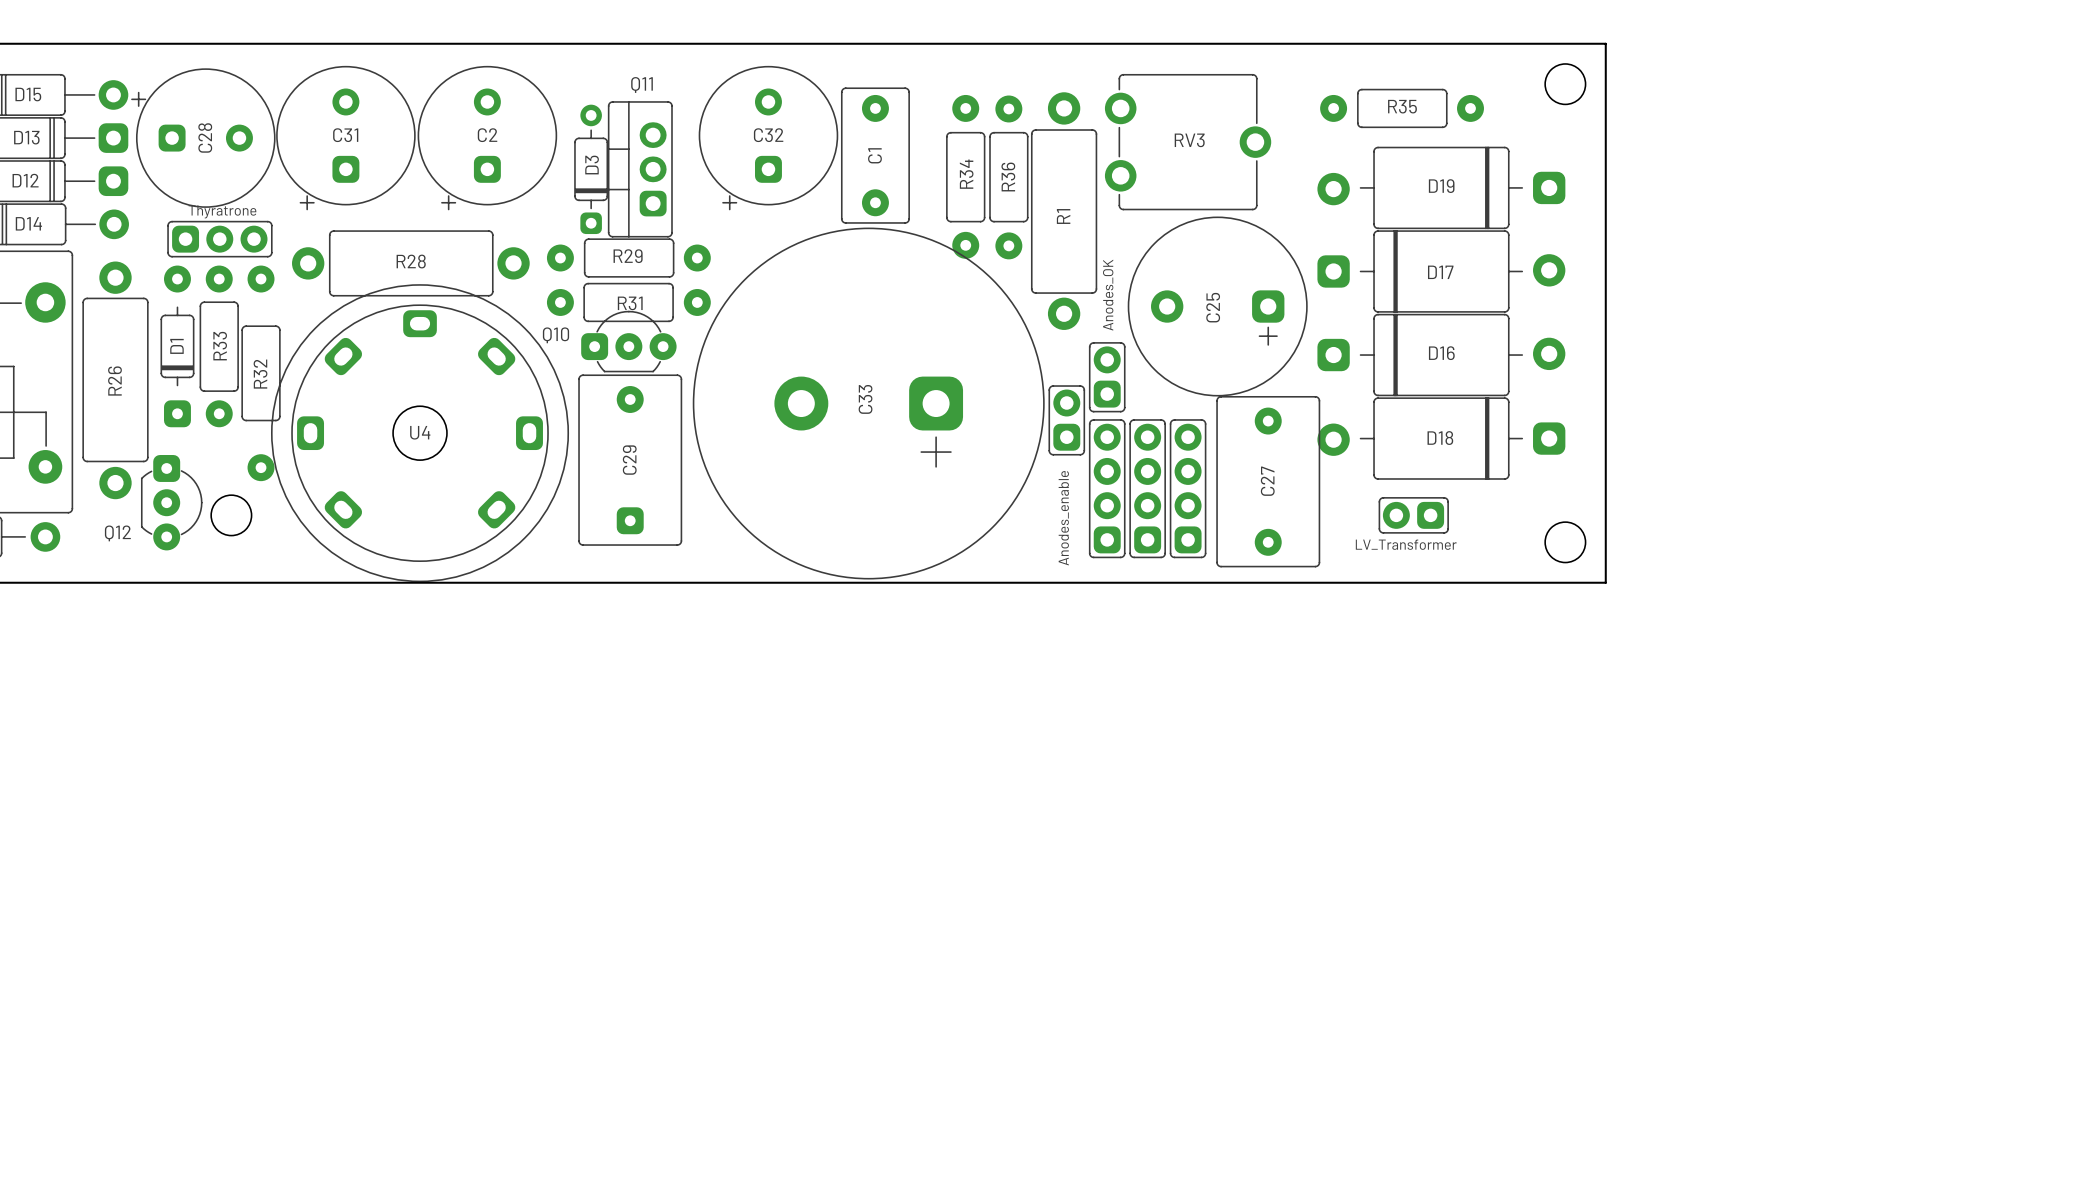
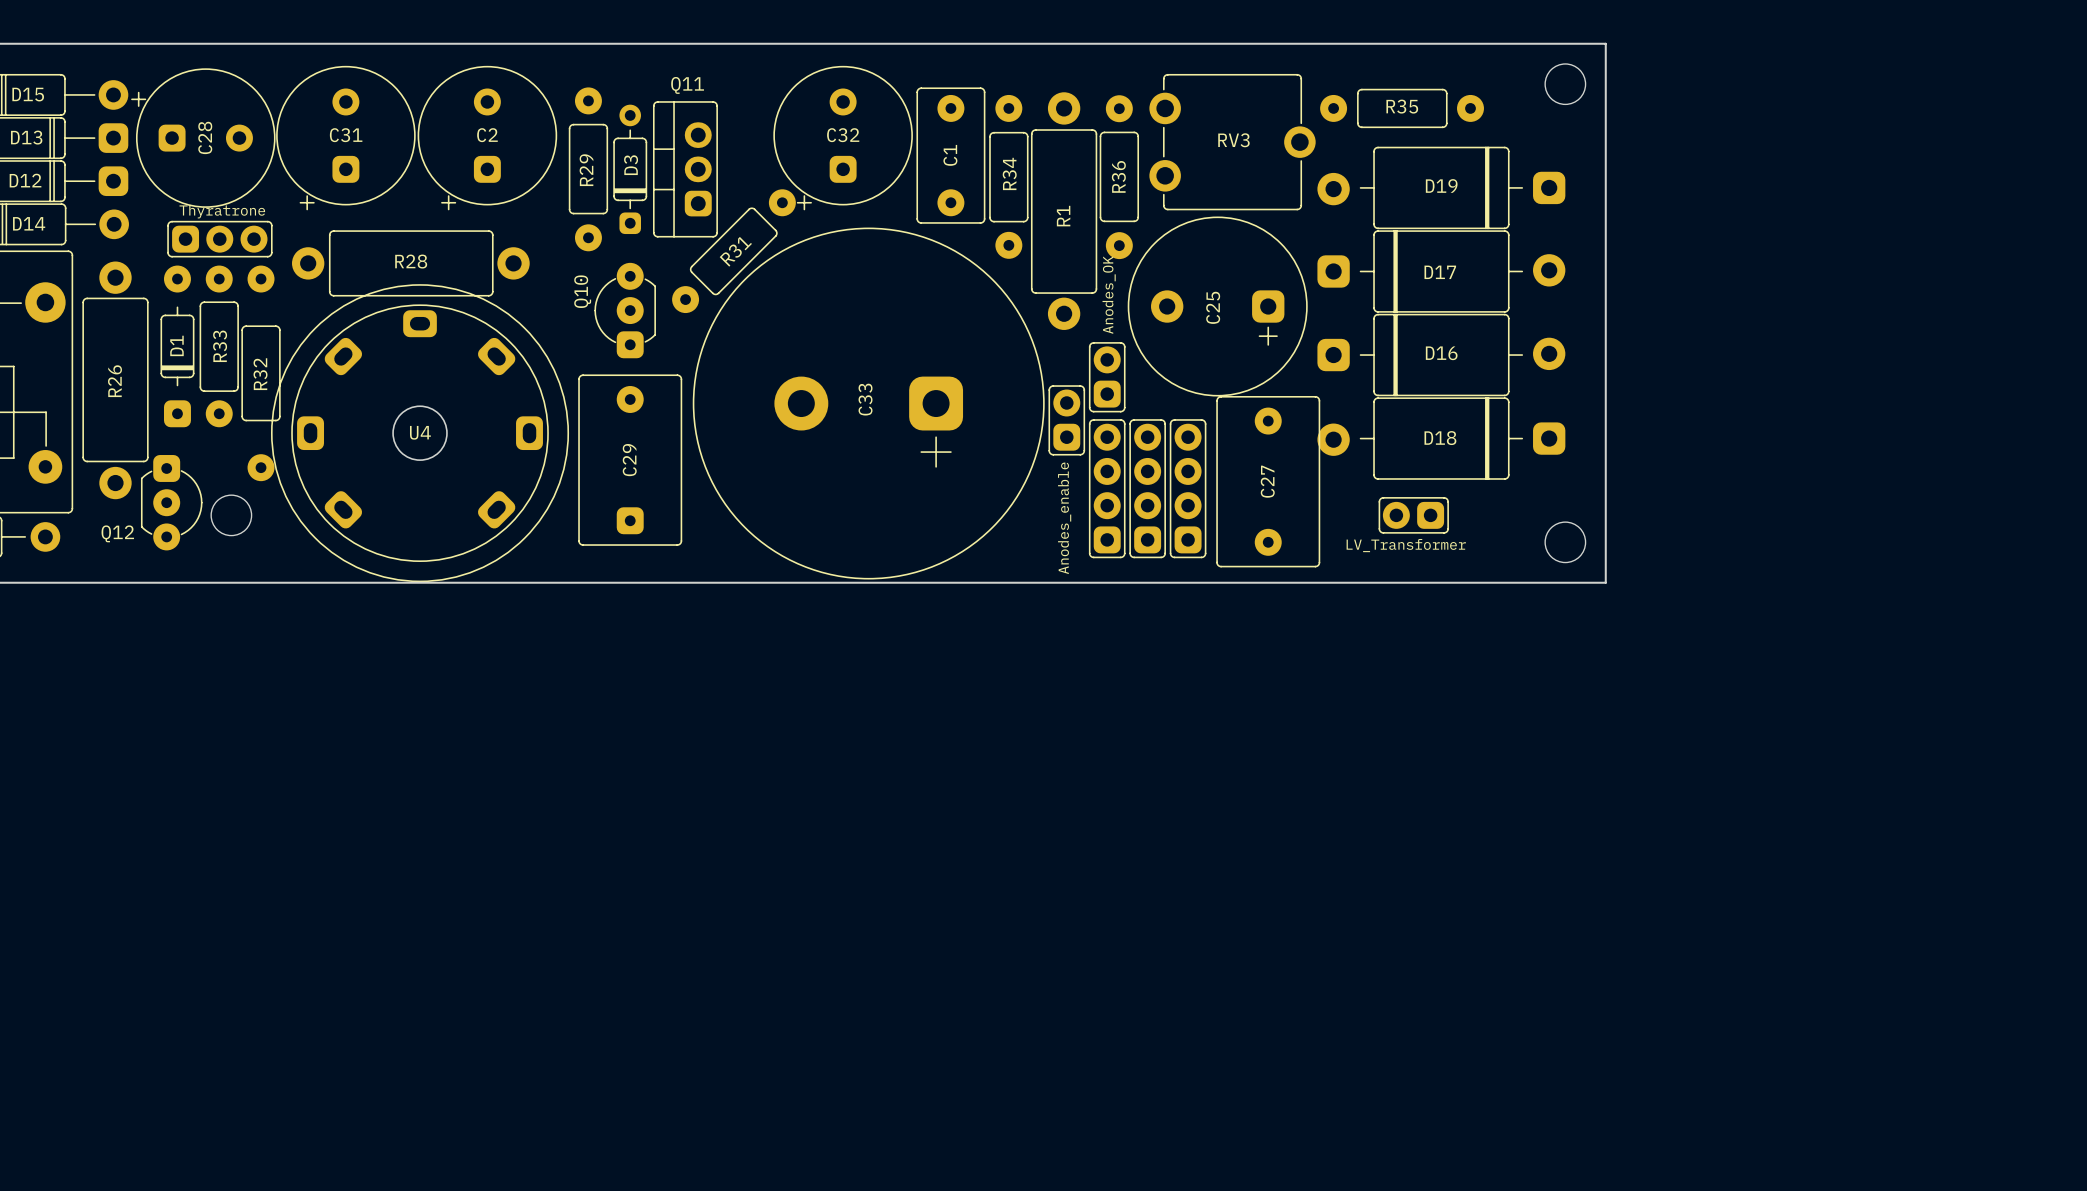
C32 position: (768, 138) -> (843, 138)
RV3 position: (1188, 142) -> (1232, 142)
C1 position: (875, 155) -> (950, 155)
D3 position: (591, 169) -> (630, 169)
Q11 position: (640, 169) -> (685, 169)
R34 position: (965, 176) -> (1008, 176)
R36 position: (1008, 177) -> (1119, 177)
R29 rotation: 0° (628, 258) -> 90° counterclockwise (588, 169)
R31 rotation: 0° (628, 302) -> 45° counterclockwise (733, 251)
R31 position: (628, 302) -> (733, 251)
Q10 name position: Q10 (555, 335) -> Q10 (582, 291)
Q10 rotation: 0° (628, 341) -> 90° counterclockwise (625, 310)

